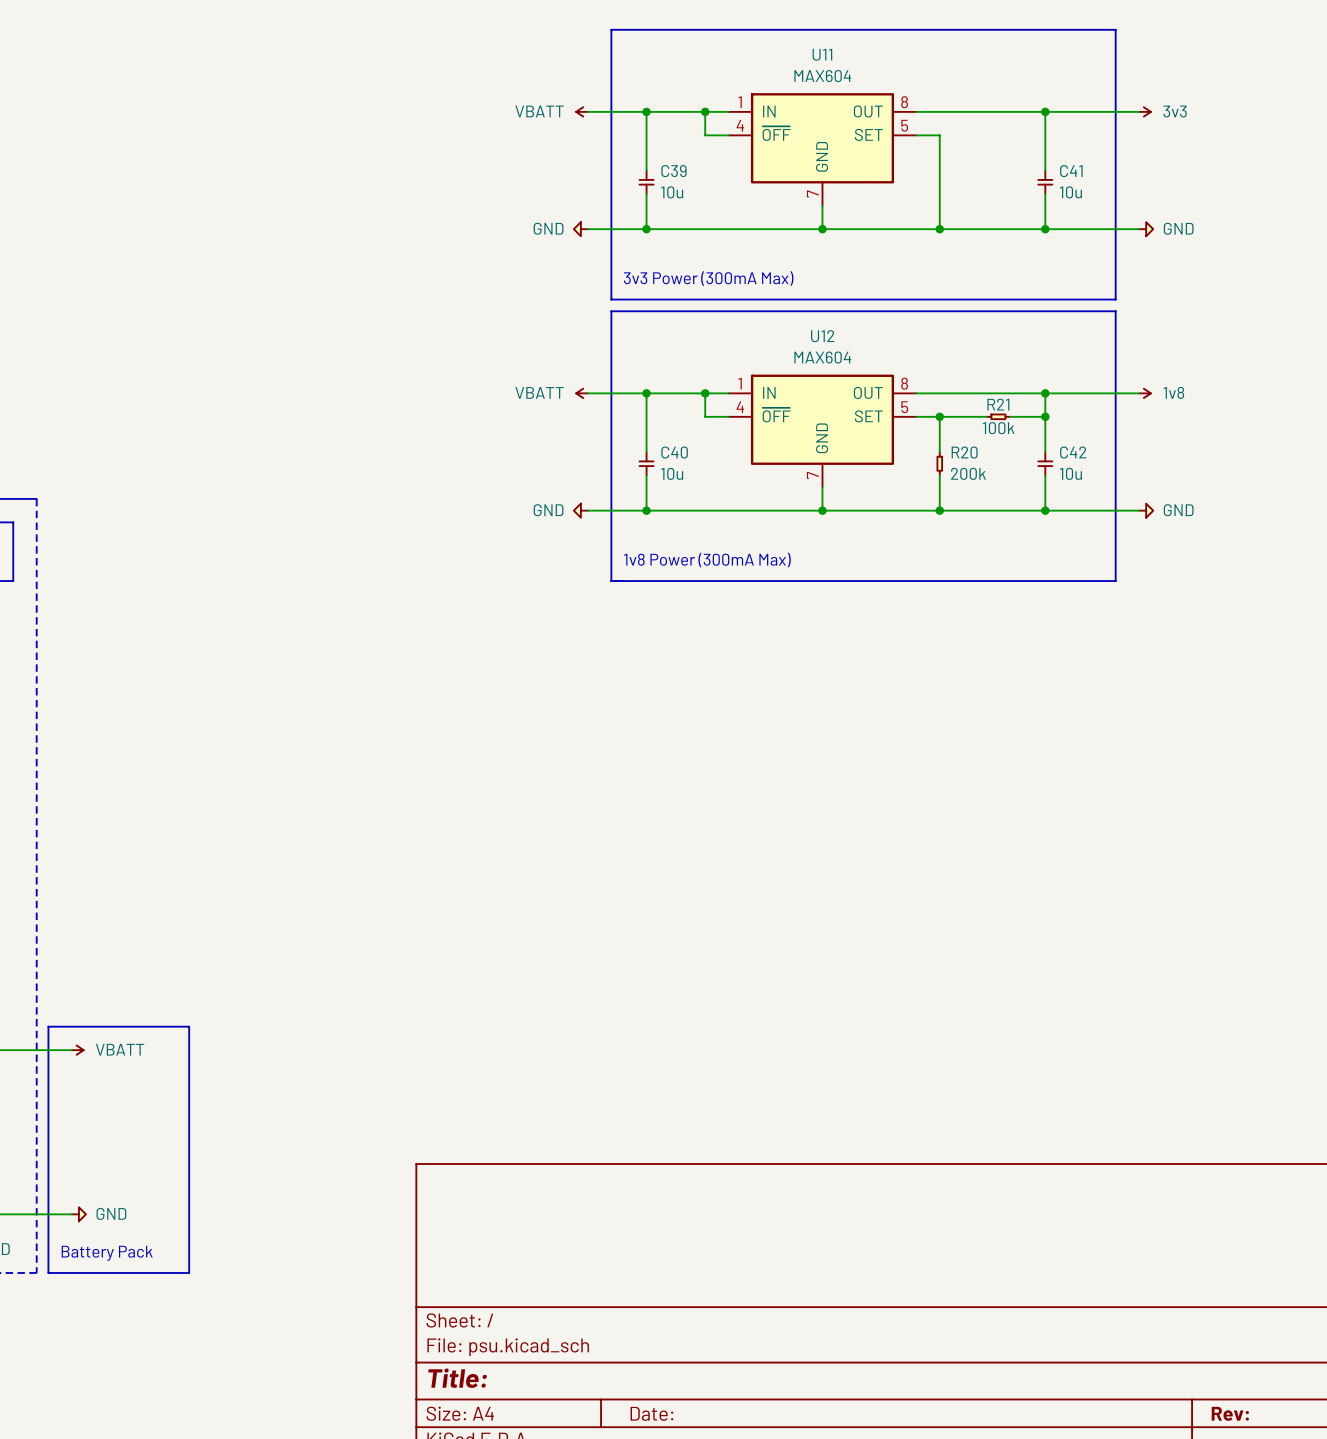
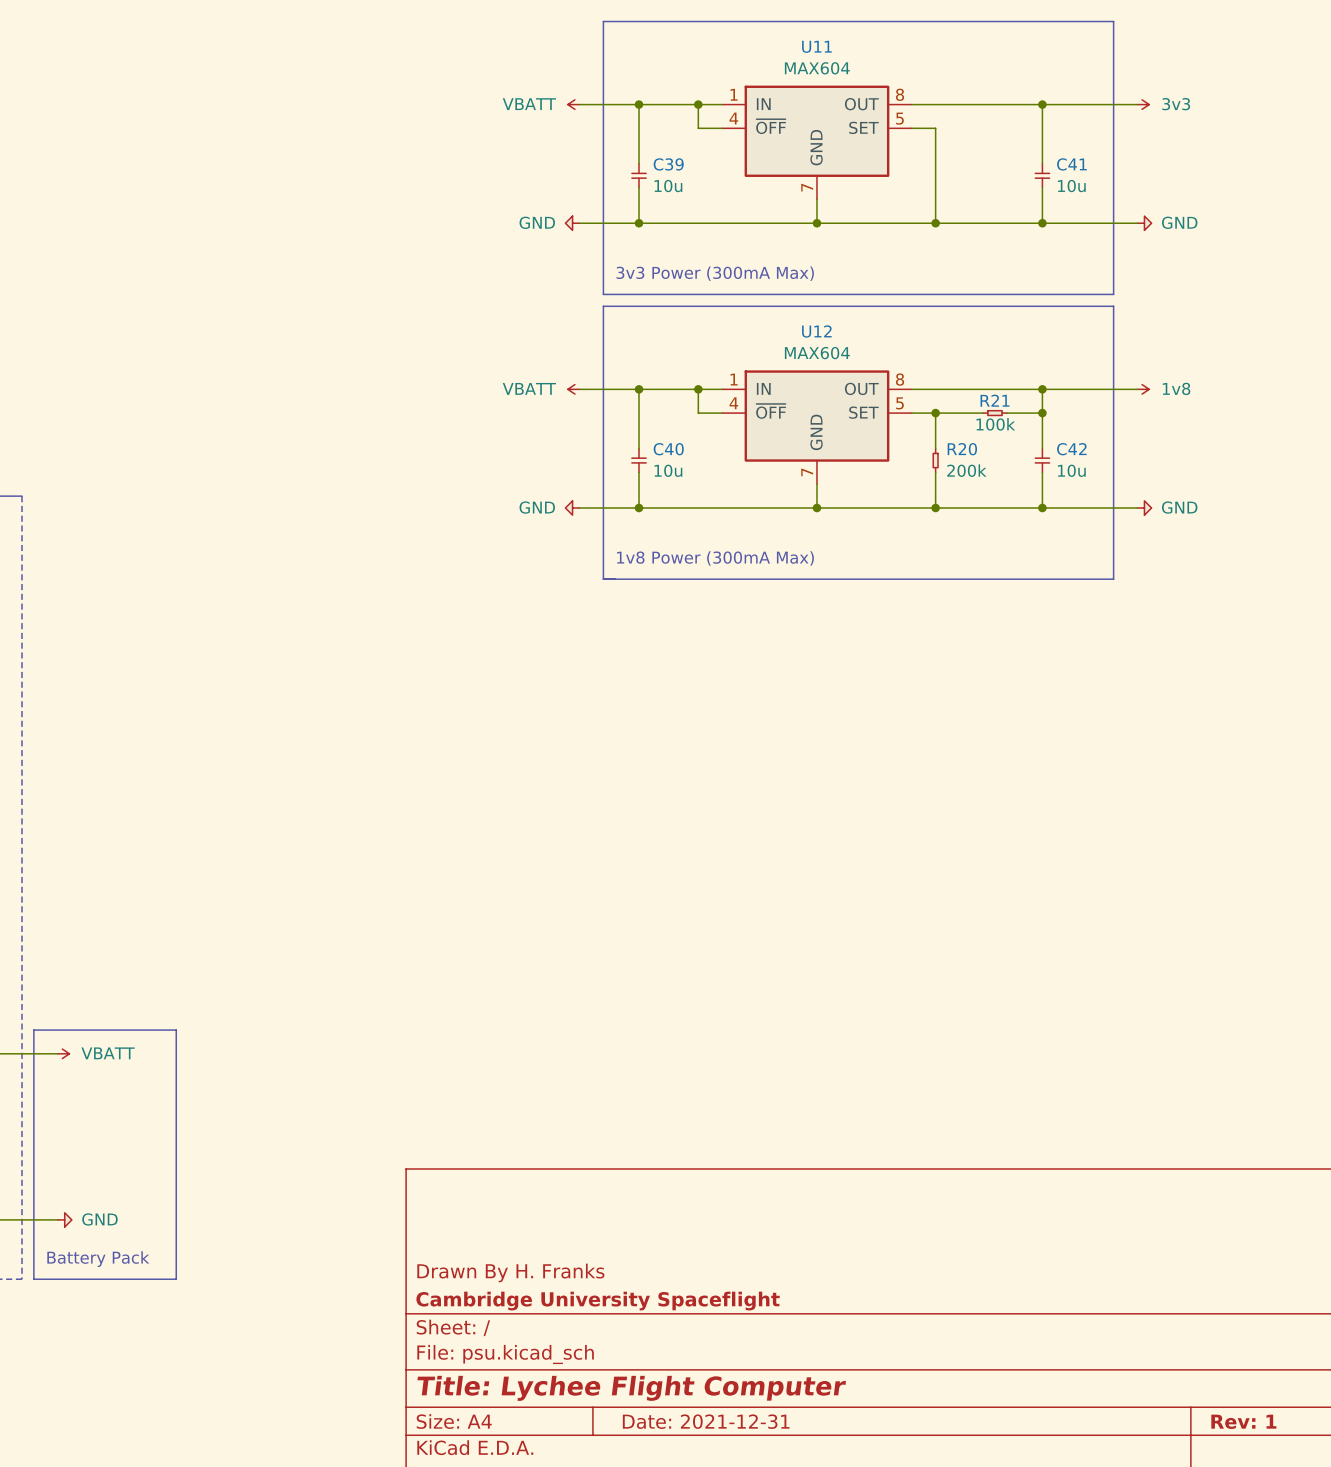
title block: none -> Drawn By H. Franks (510, 1272)
title block: none -> Cambridge University Spaceflight (598, 1301)
title block: Title: (457, 1378) -> Title: Lychee Flight Computer (631, 1388)
title block: Date: (651, 1413) -> Date: 2021-12-31 (706, 1421)
title block: Rev: (1230, 1413) -> Rev: 1 (1243, 1421)

